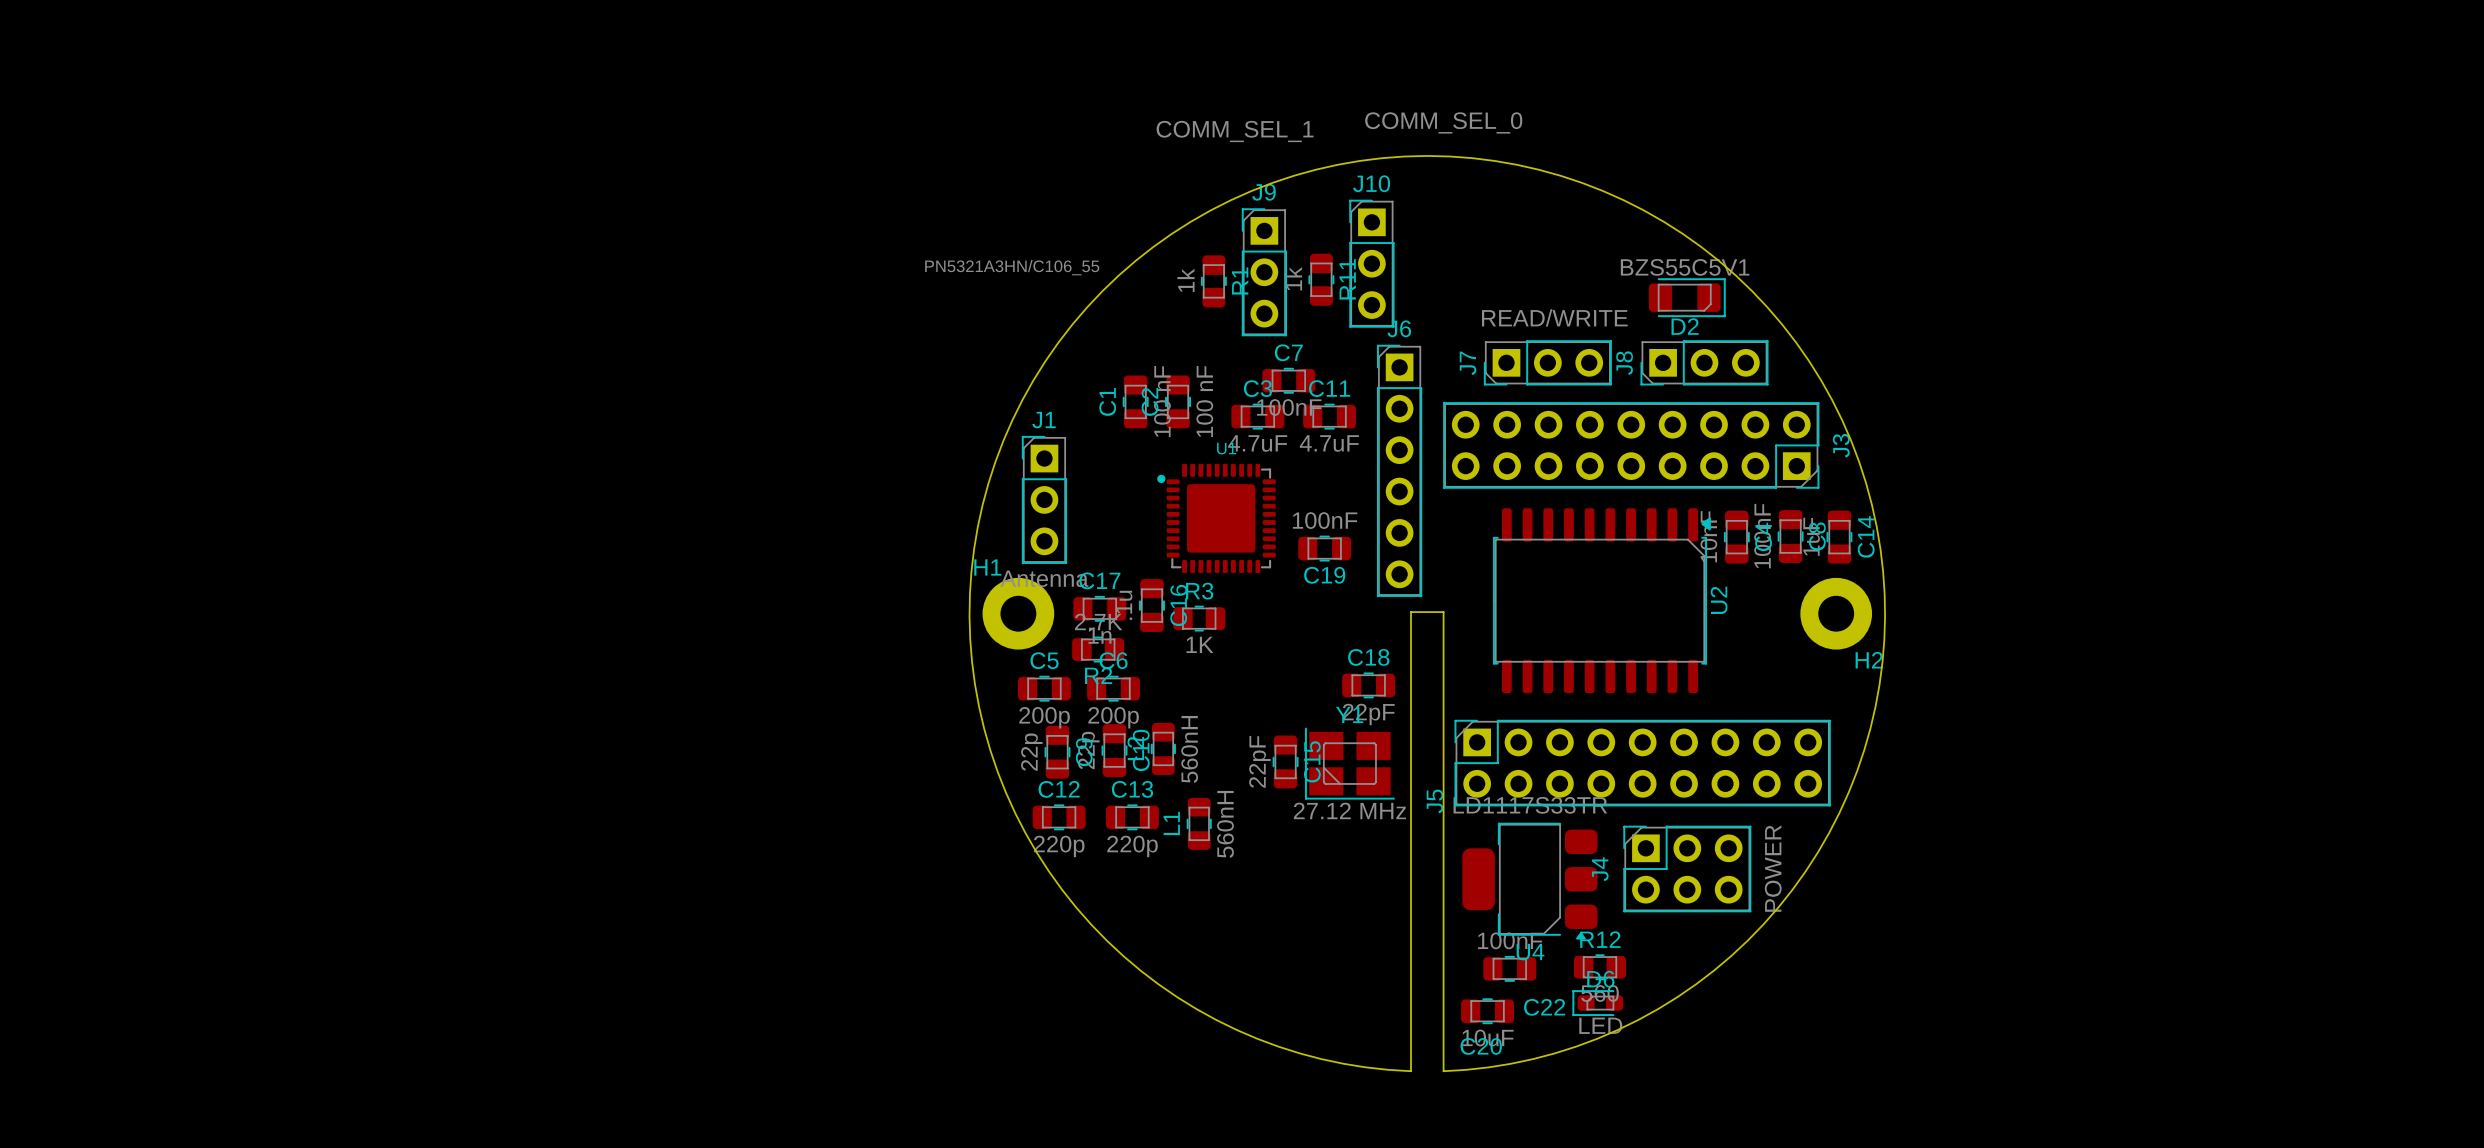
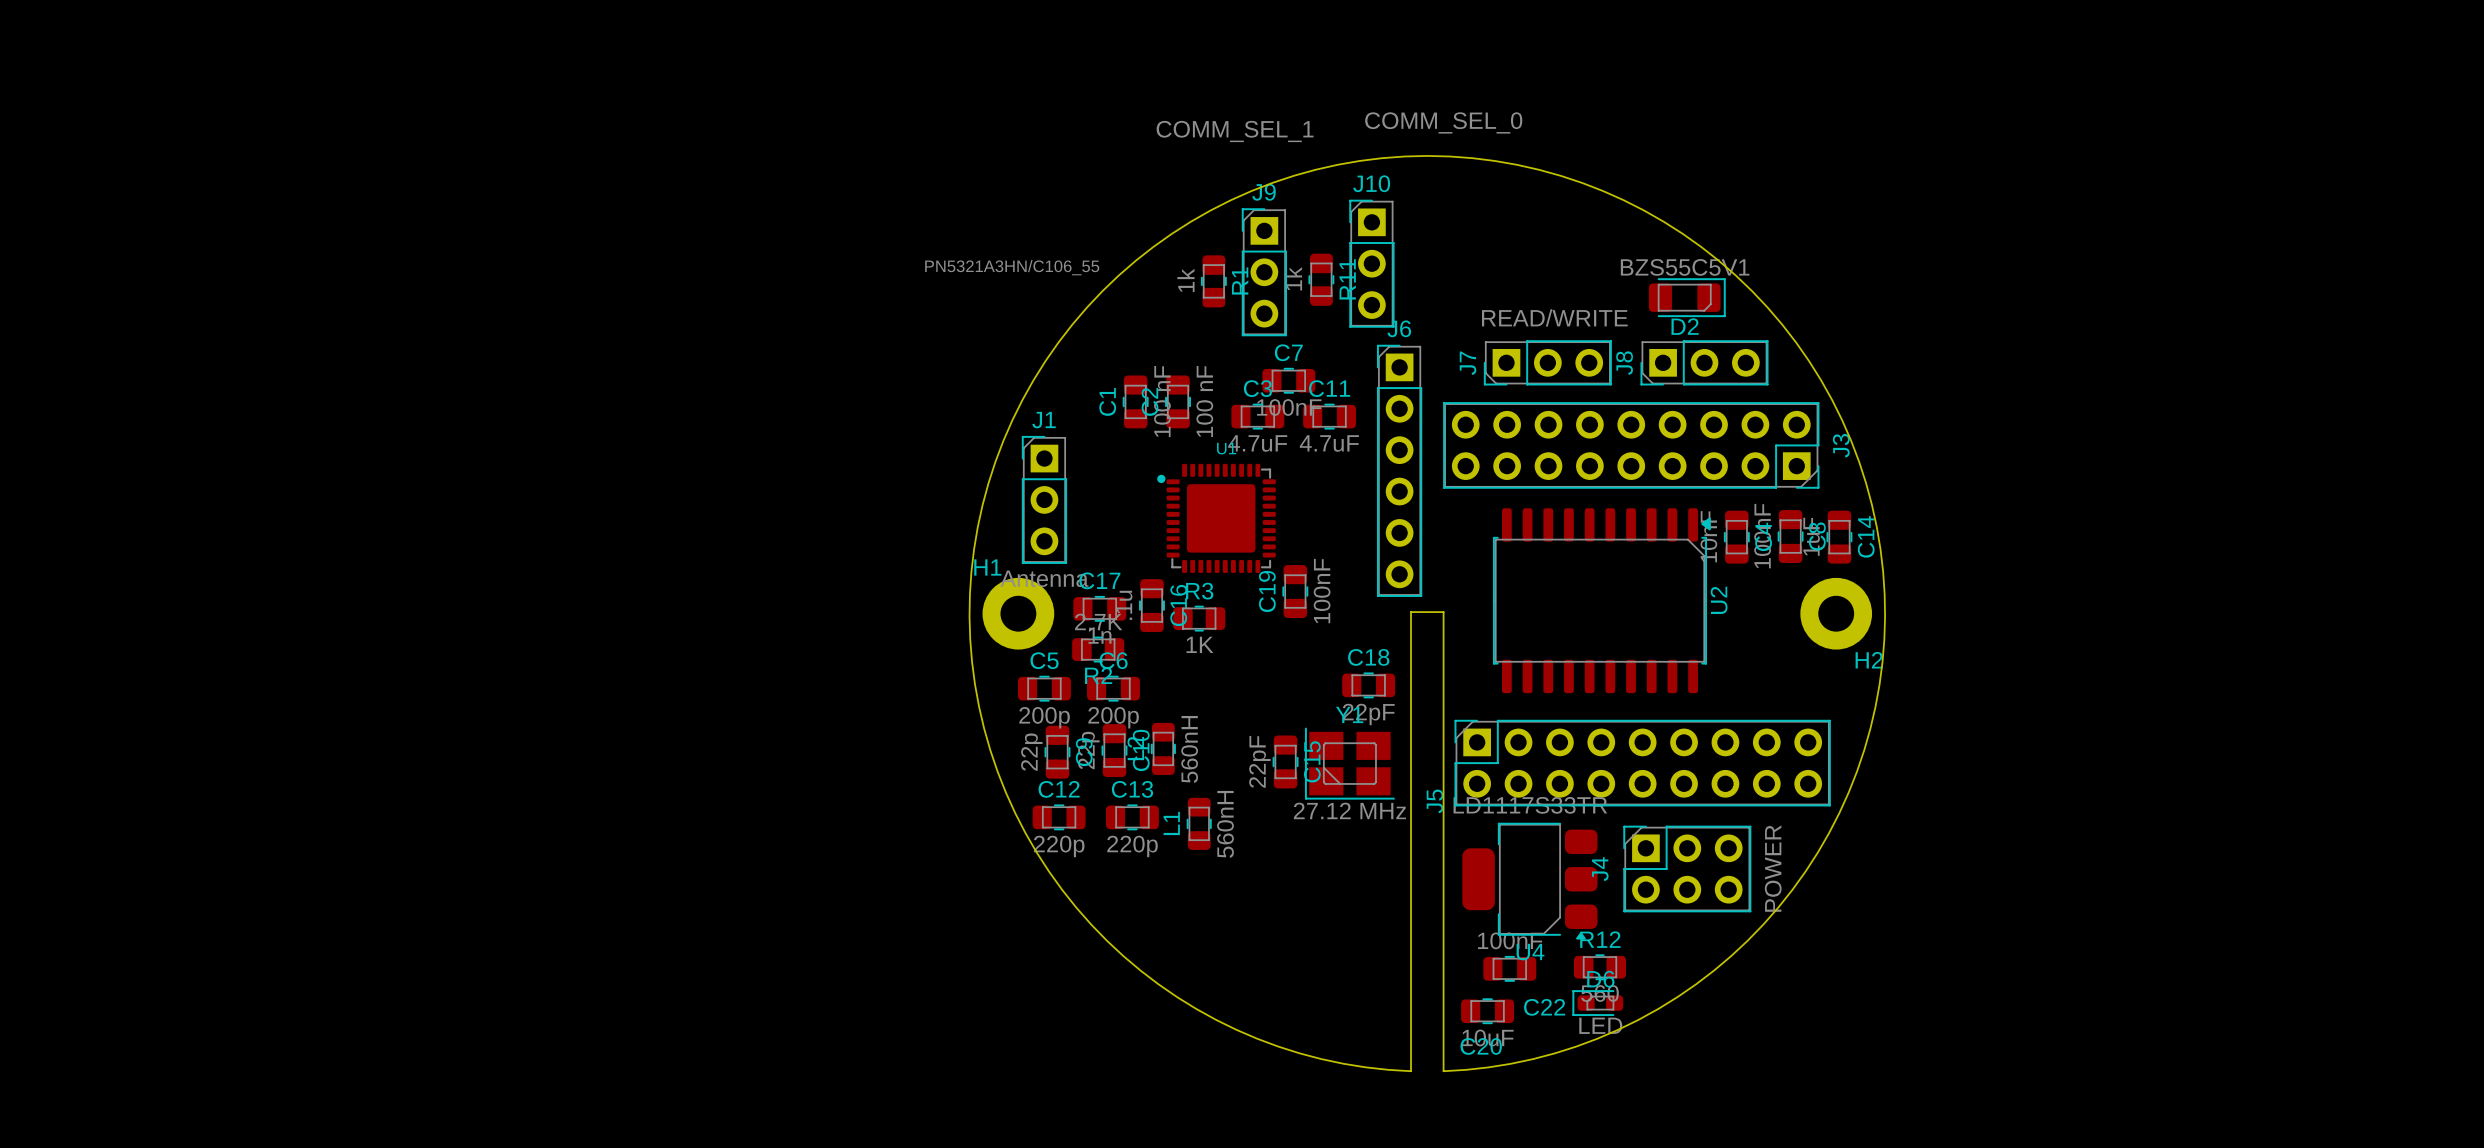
C19 rotation: 0° (1324, 548) -> 90° clockwise (1295, 591)
C19 position: (1324, 548) -> (1295, 591)

